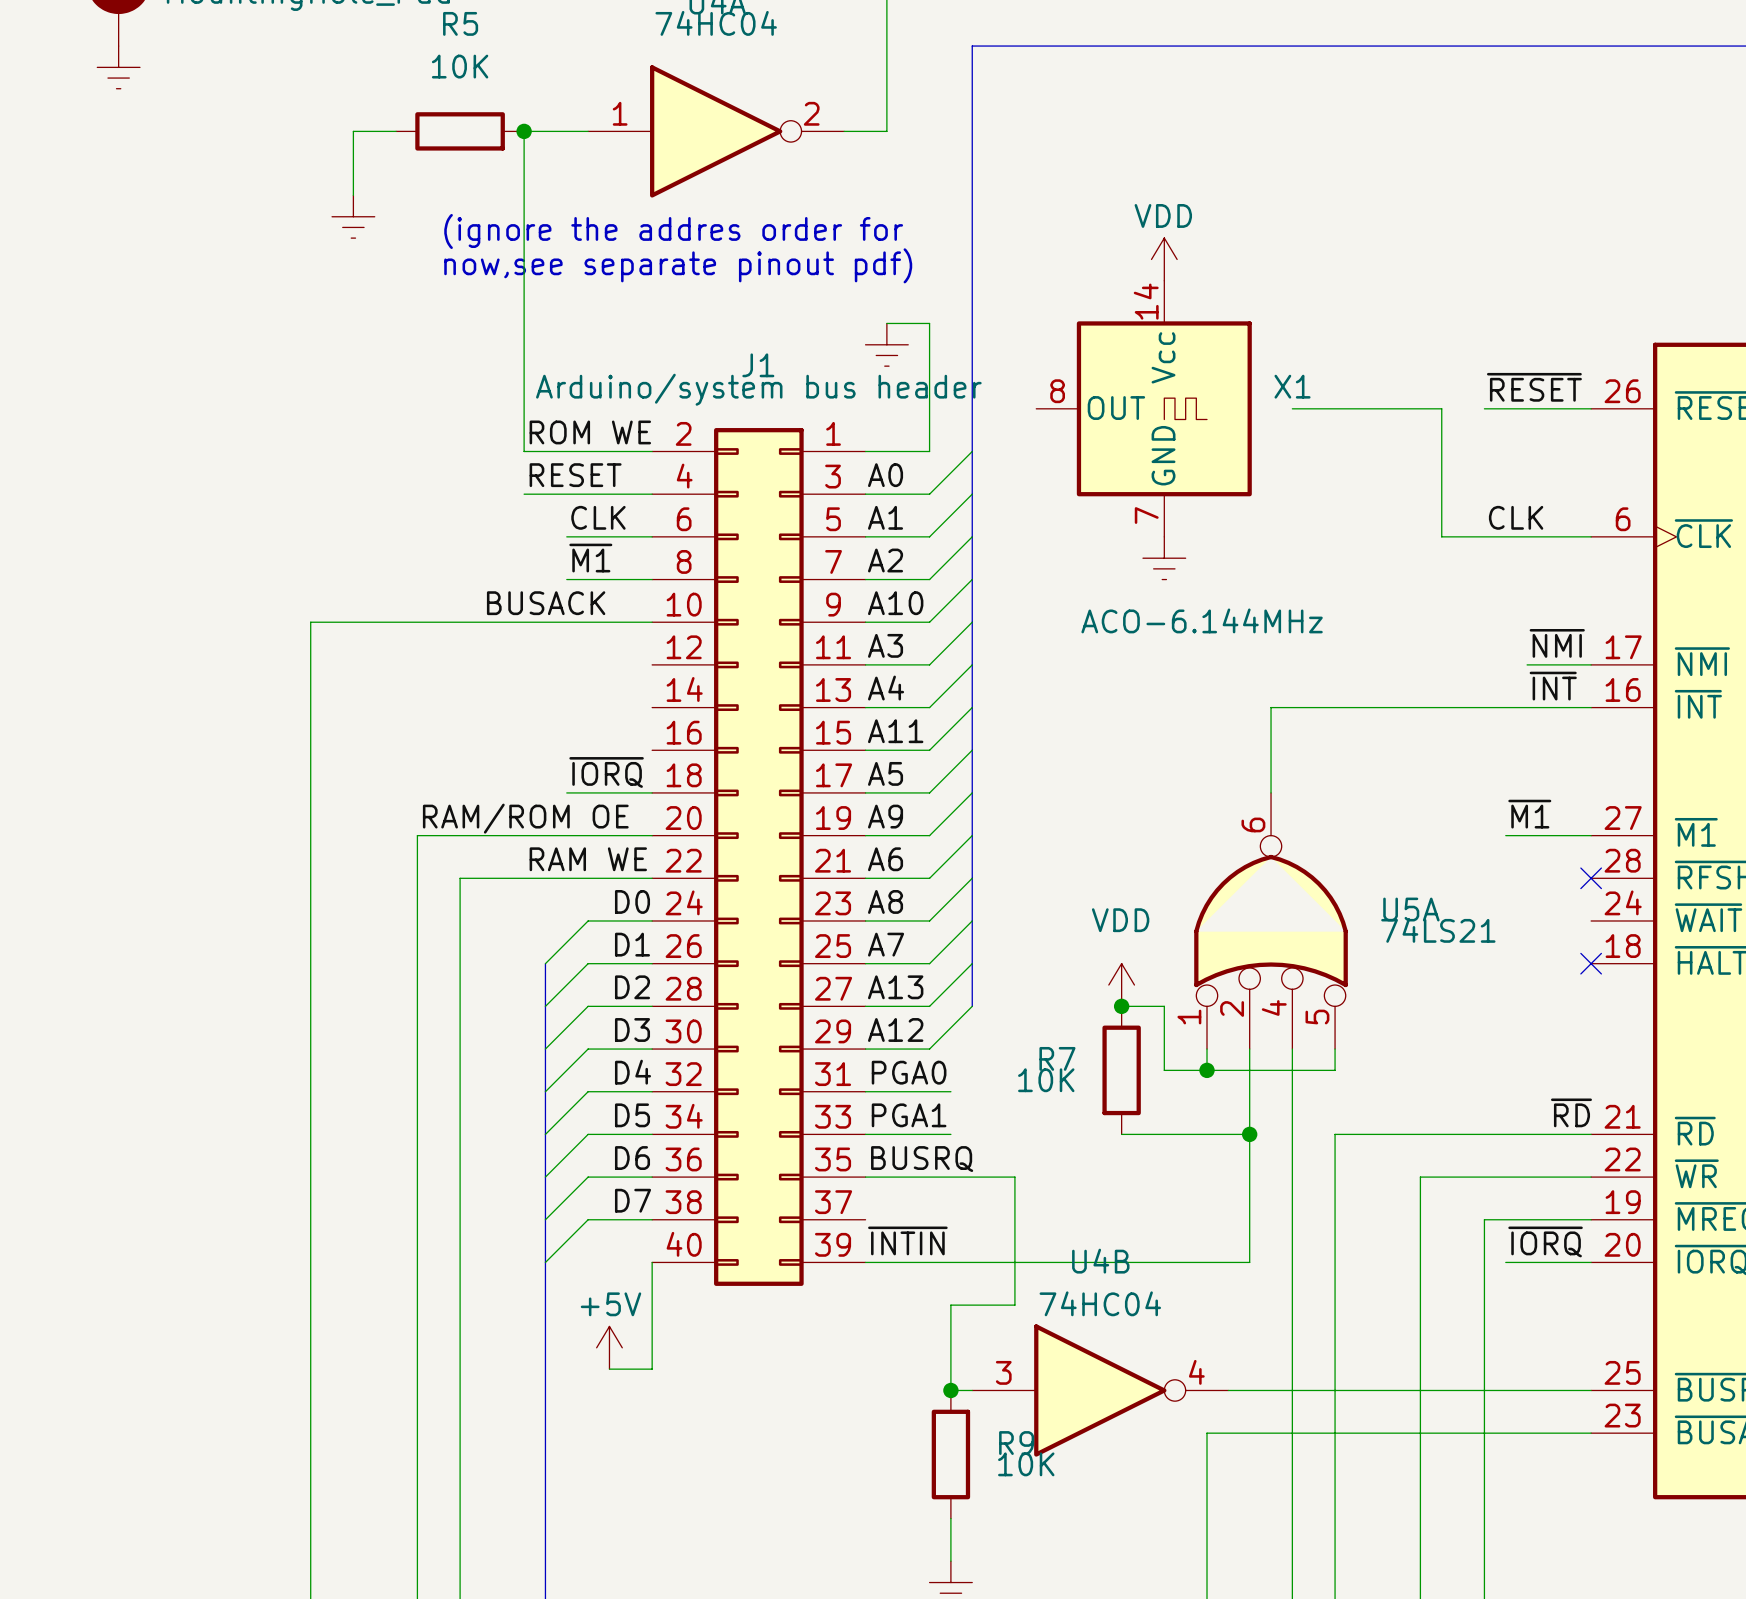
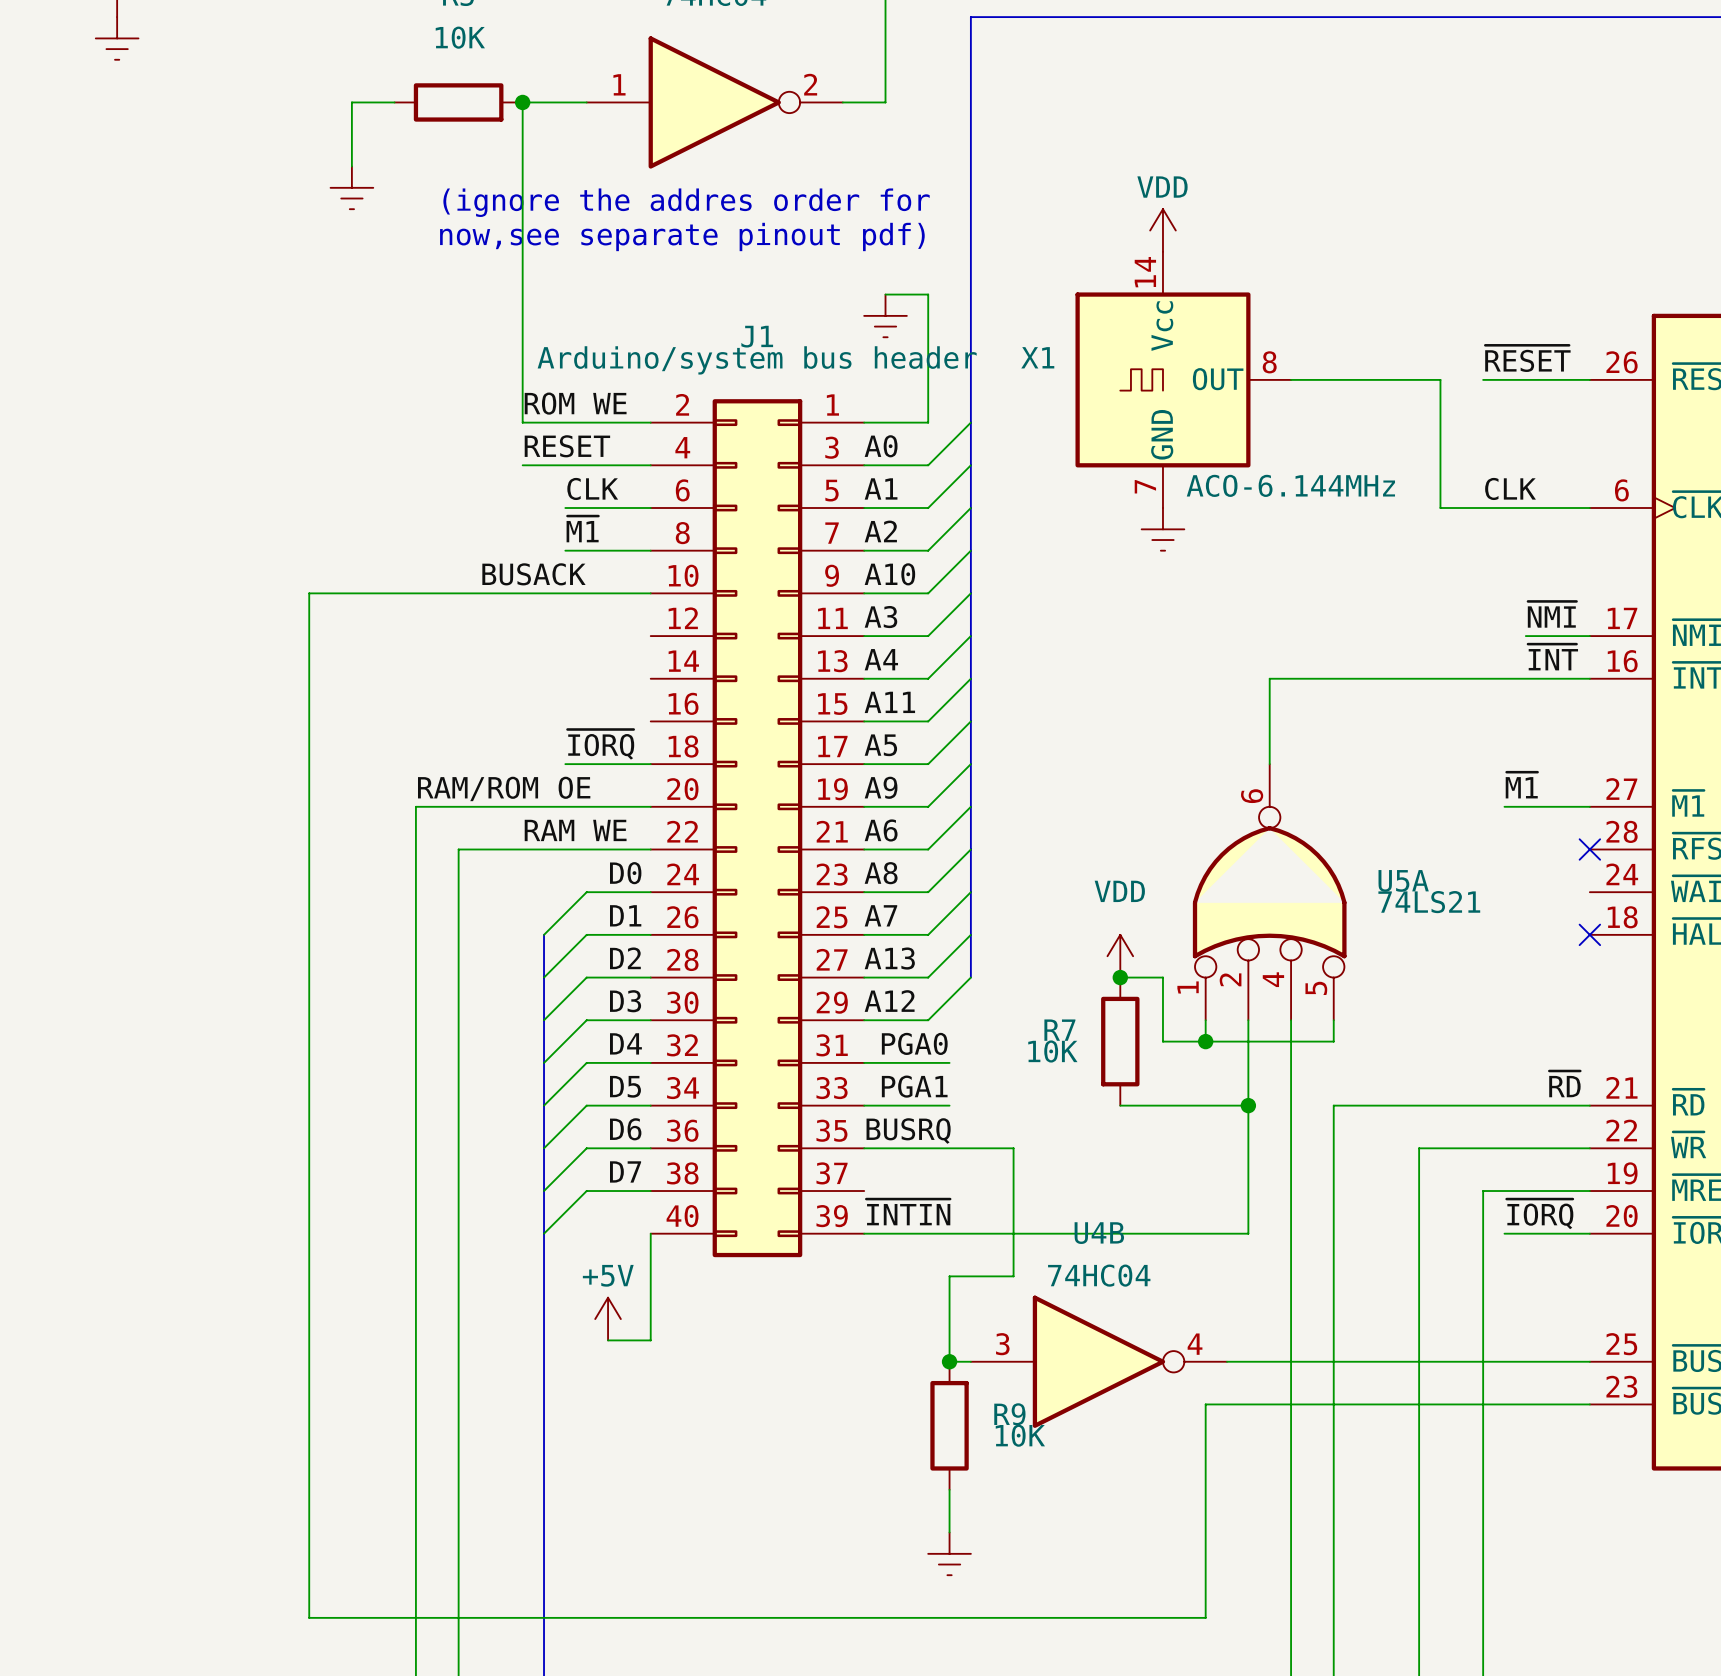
X1 flip: as is (1164, 408) -> left-right (1162, 379)
X1 value position: ACO-6.144MHz (1202, 620) -> ACO-6.144MHz (1290, 485)

